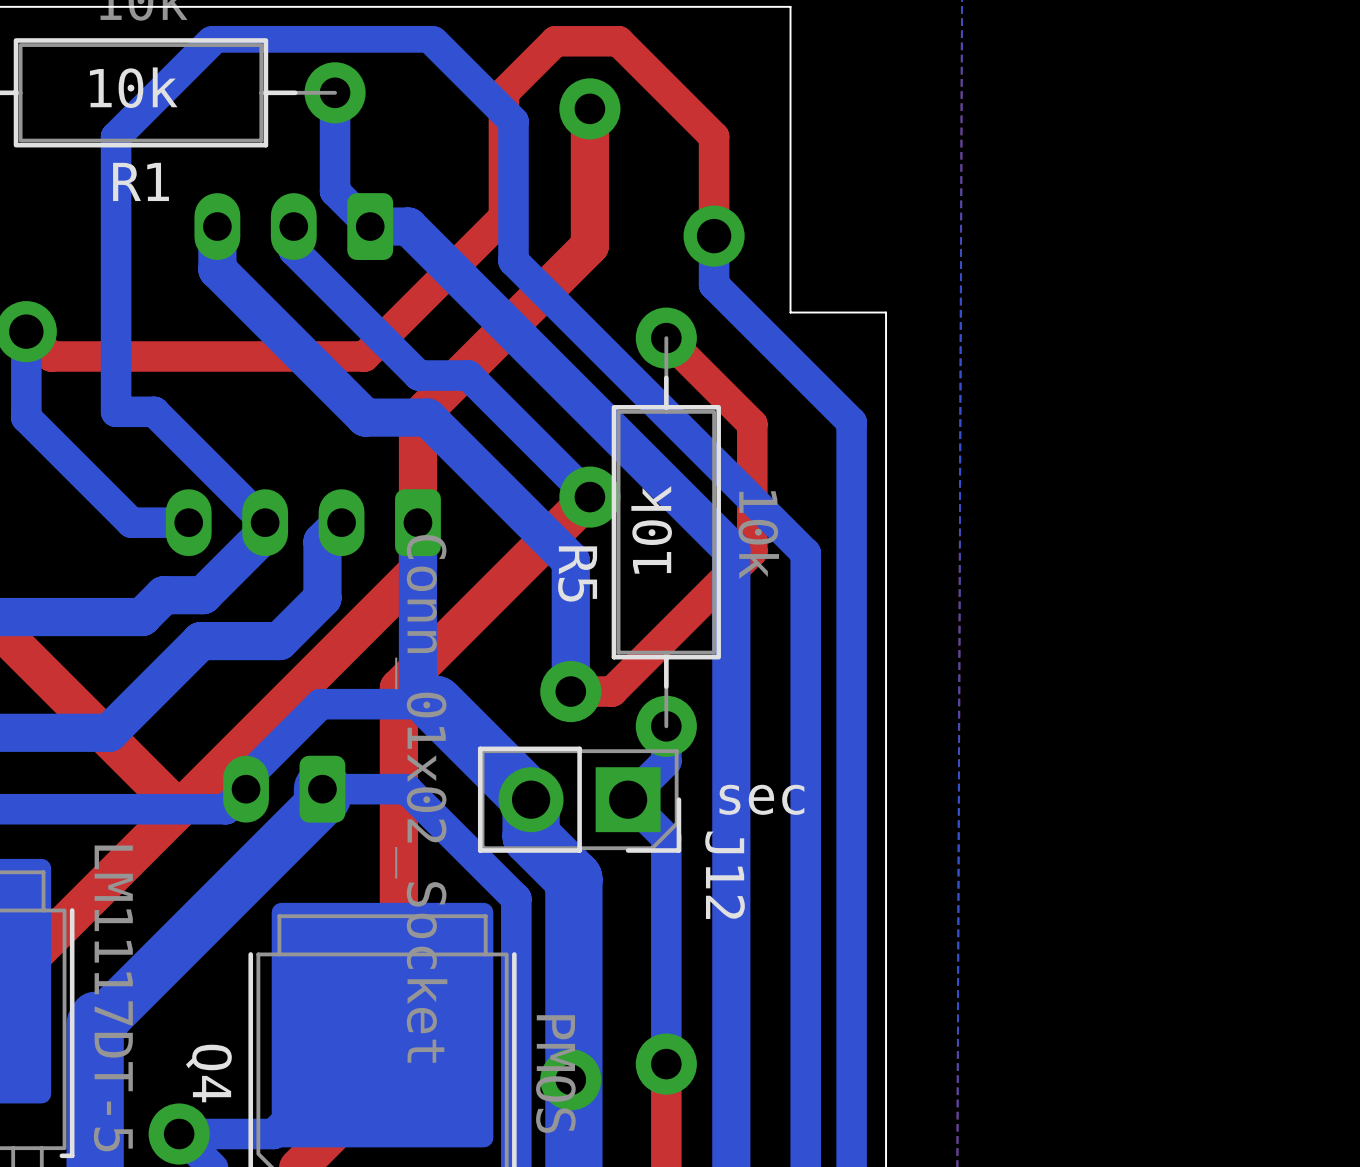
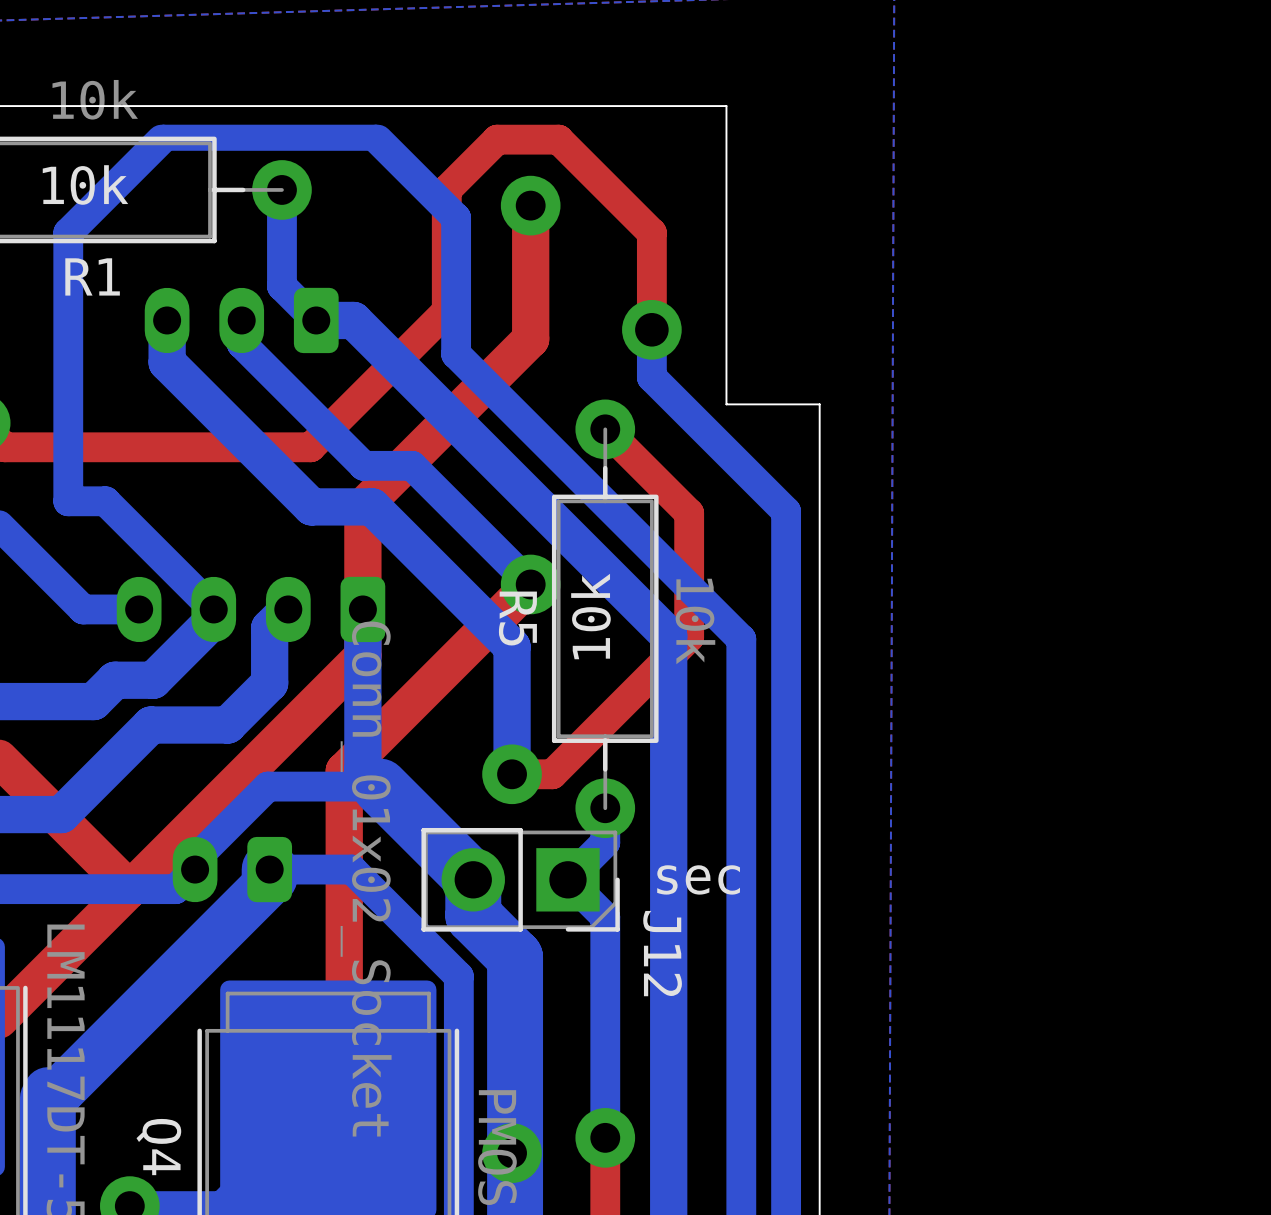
R5 name position: R5 (577, 573) -> R5 (517, 618)

